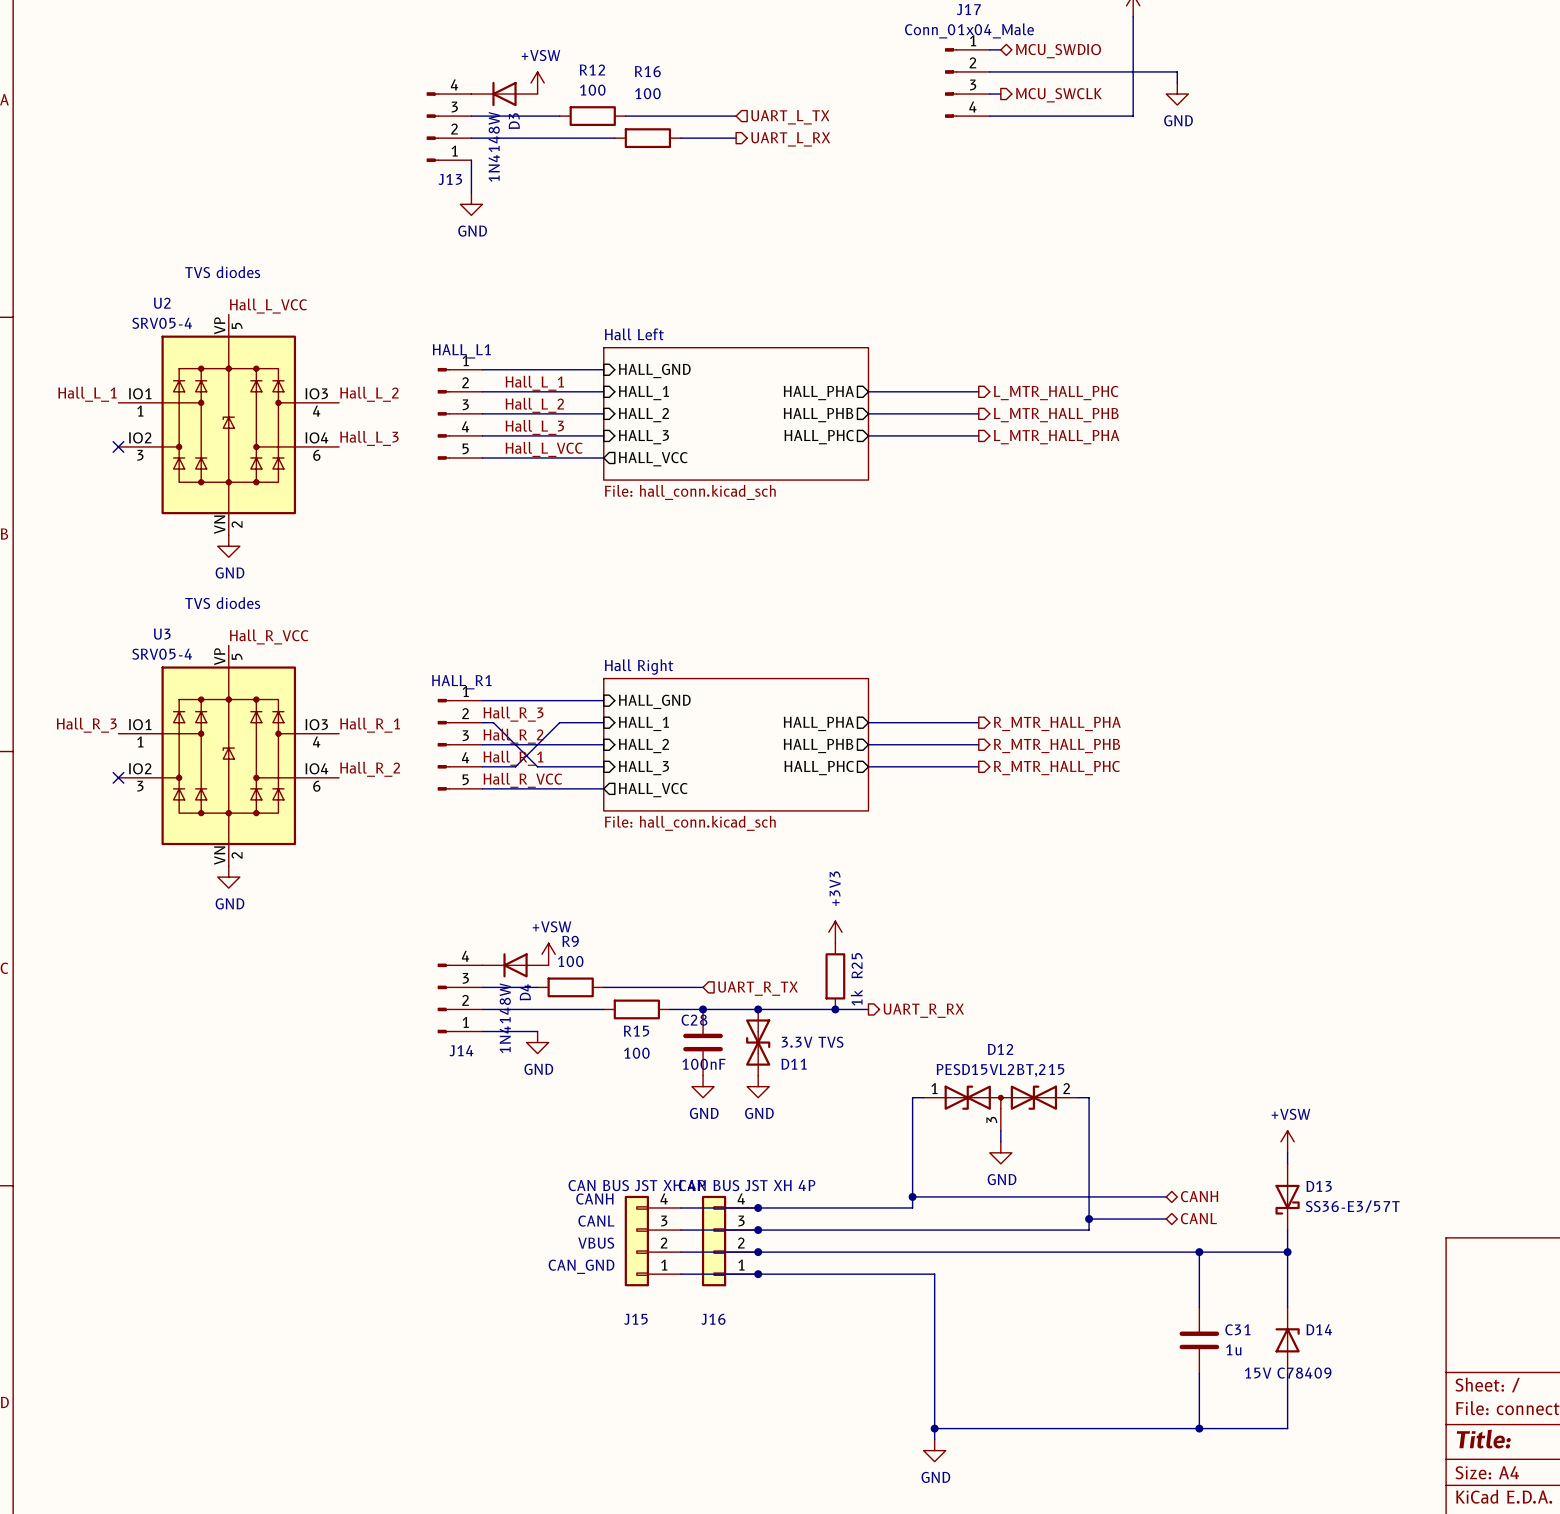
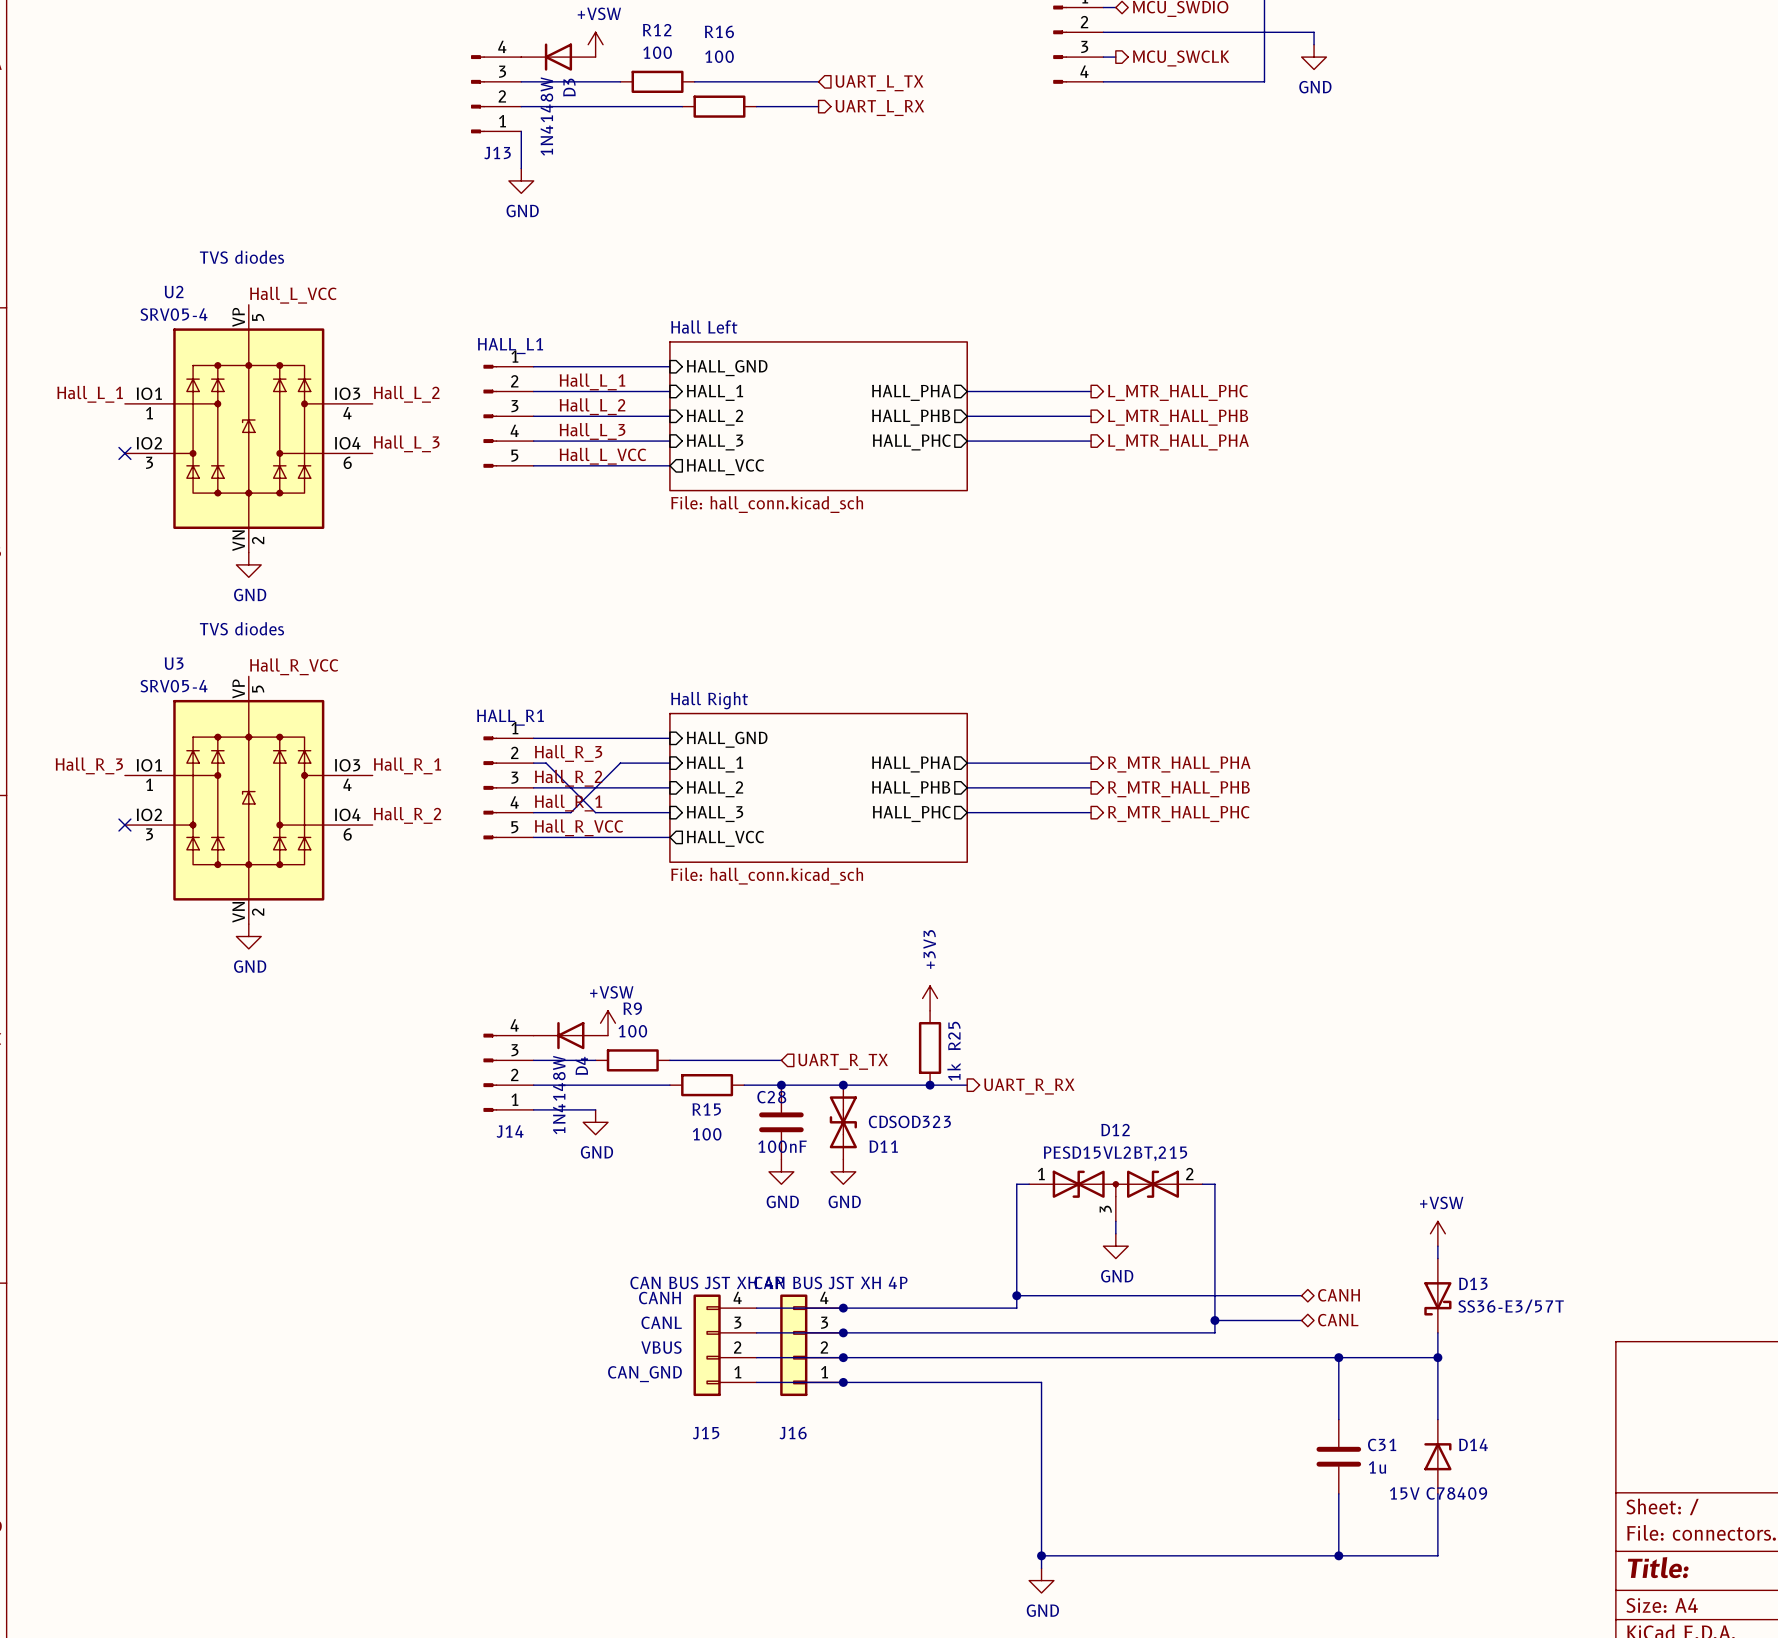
D11 value: 3.3V TVS (812, 1042) -> CDSOD323 (909, 1121)

